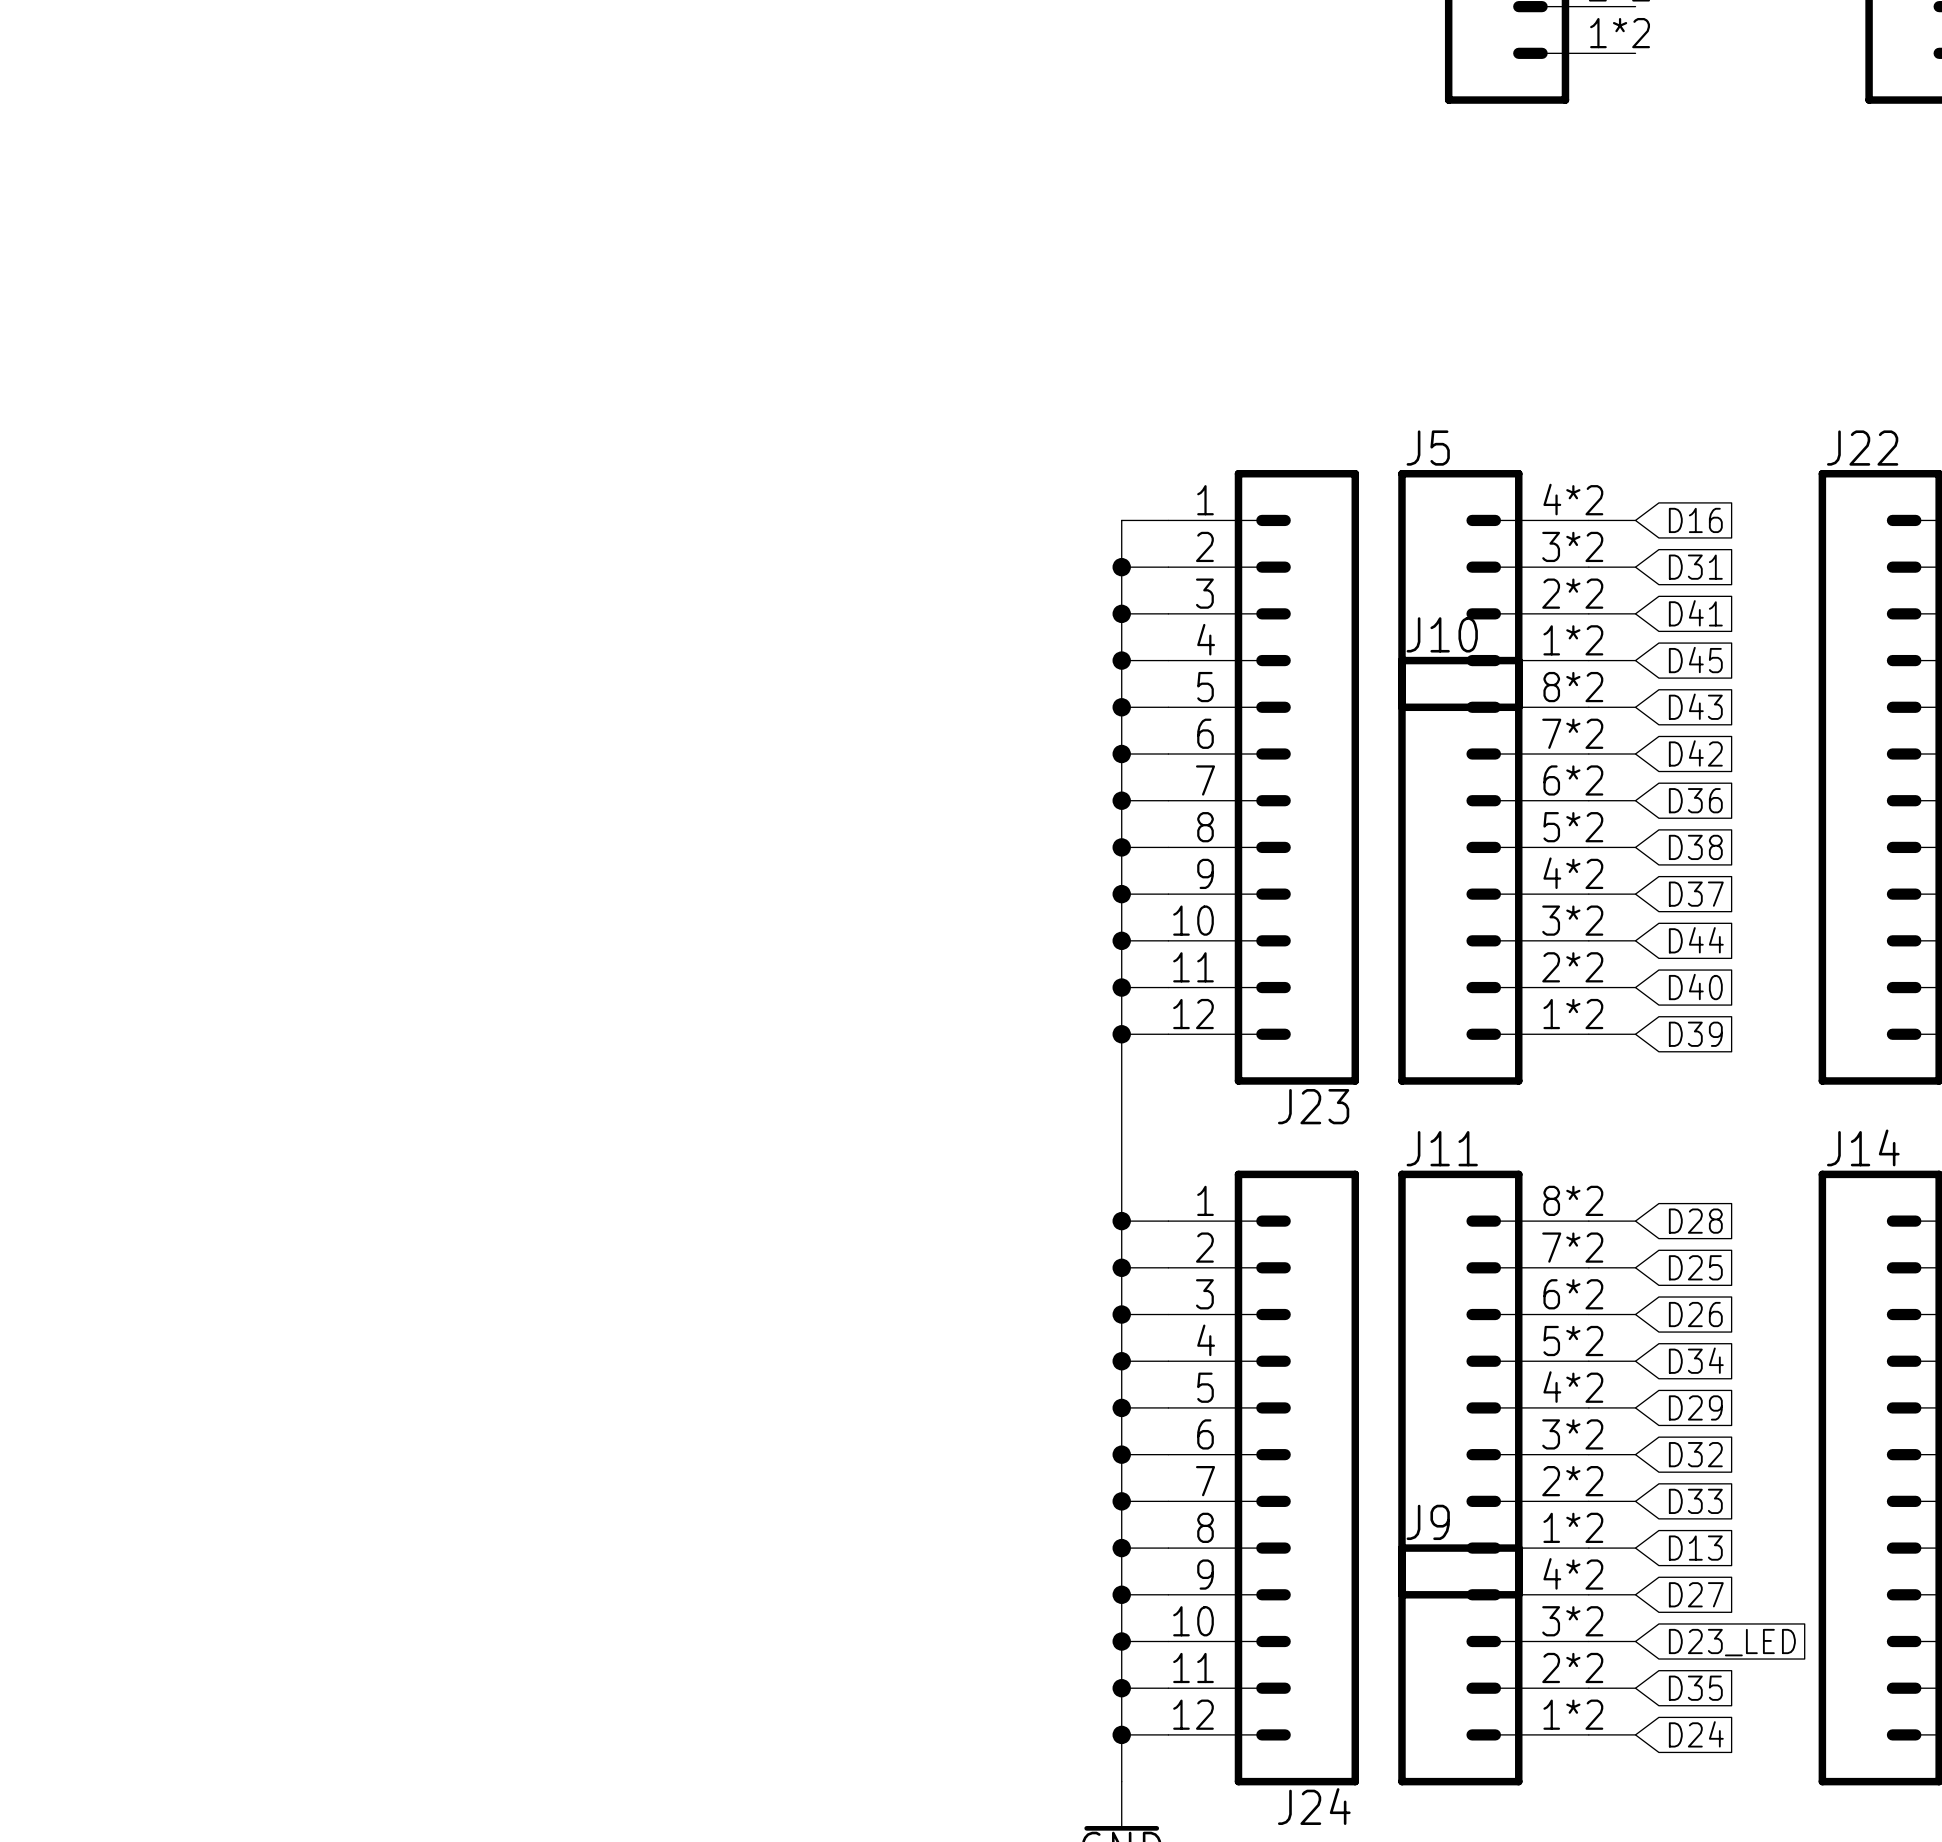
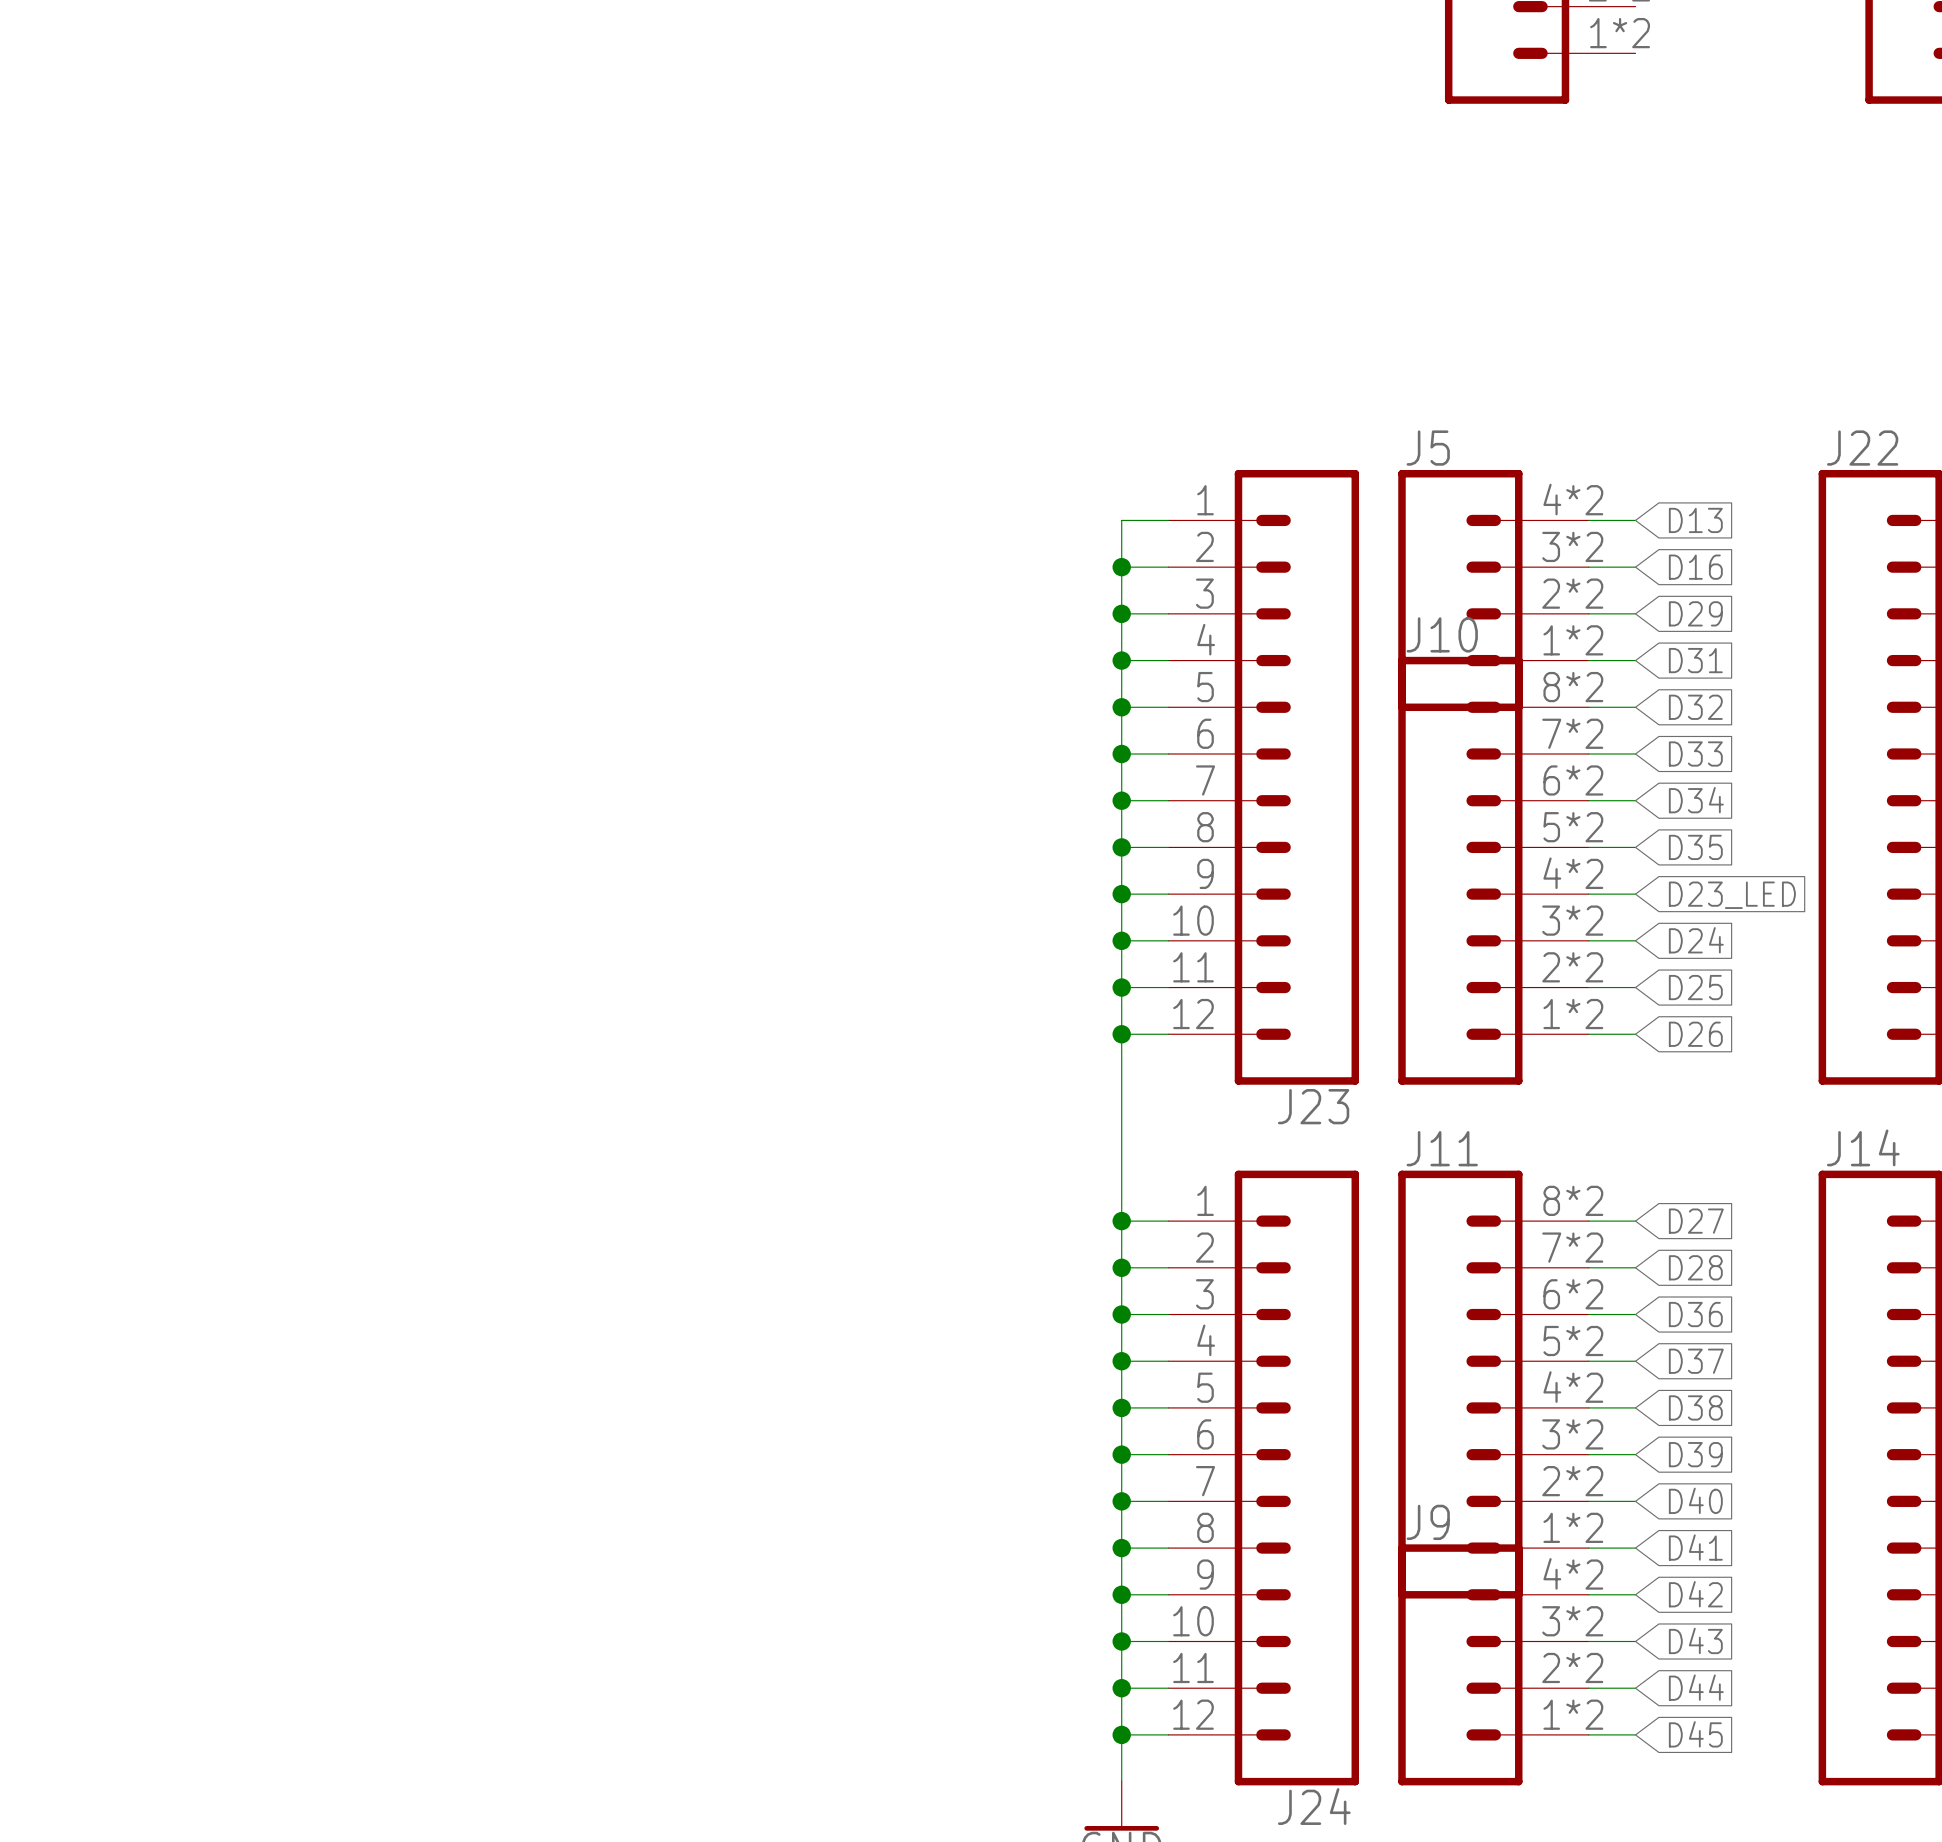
global label: D16 (1695, 520) -> D13 (1695, 520)
global label: D31 (1695, 567) -> D16 (1695, 567)
global label: D41 (1695, 613) -> D29 (1695, 613)
global label: D45 (1695, 660) -> D31 (1695, 660)
global label: D43 (1695, 706) -> D32 (1695, 707)
global label: D42 (1695, 753) -> D33 (1695, 753)
global label: D36 (1695, 800) -> D34 (1696, 800)
global label: D38 (1695, 847) -> D35 (1695, 847)
global label: D37 (1696, 894) -> D23_LED (1732, 895)
global label: D44 (1696, 940) -> D24 (1696, 940)
global label: D40 (1695, 986) -> D25 (1695, 987)
global label: D39 (1695, 1034) -> D26 (1695, 1034)
global label: D28 (1695, 1221) -> D27 (1696, 1221)
global label: D25 (1695, 1267) -> D28 (1695, 1267)
global label: D26 (1695, 1314) -> D36 (1695, 1314)
global label: D34 (1696, 1360) -> D37 (1696, 1361)
global label: D29 (1695, 1407) -> D38 (1695, 1407)
global label: D32 (1695, 1454) -> D39 (1695, 1454)
global label: D33 (1695, 1501) -> D40 (1695, 1500)
global label: D13 (1695, 1548) -> D41 (1695, 1547)
global label: D27 (1696, 1594) -> D42 (1695, 1594)
global label: D23_LED (1732, 1642) -> D43 (1695, 1640)
global label: D35 (1695, 1688) -> D44 (1696, 1687)
global label: D24 (1696, 1734) -> D45 (1695, 1734)

